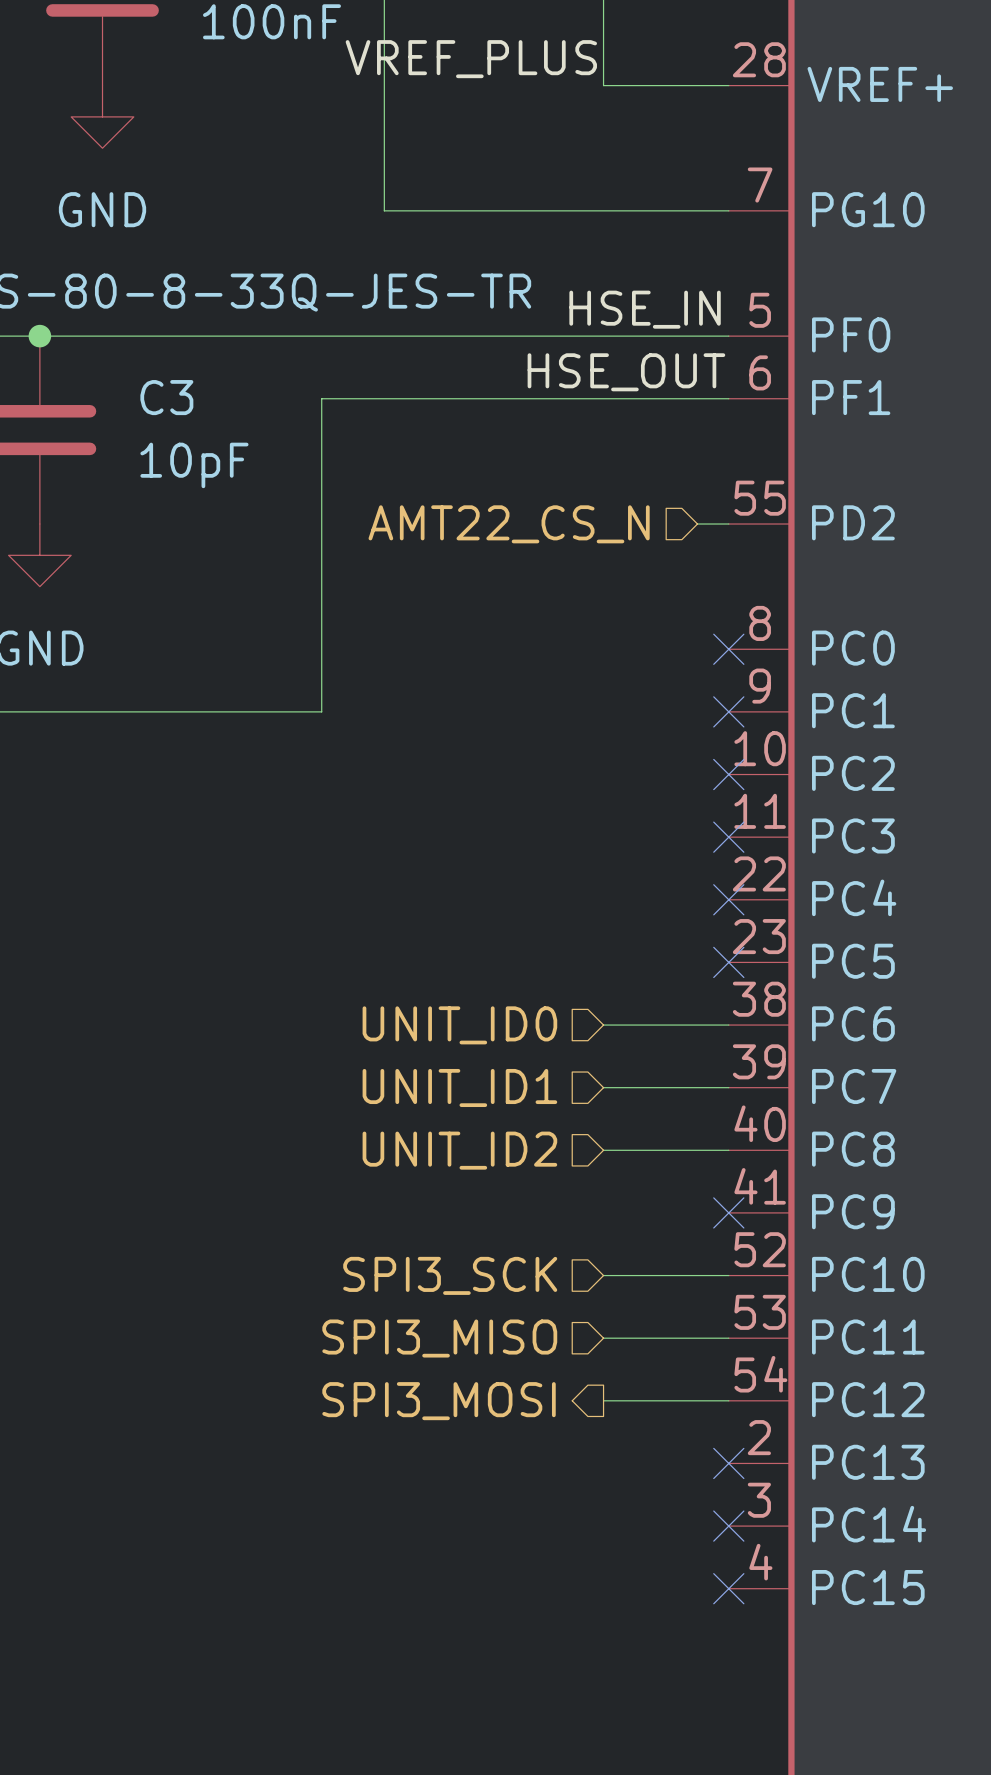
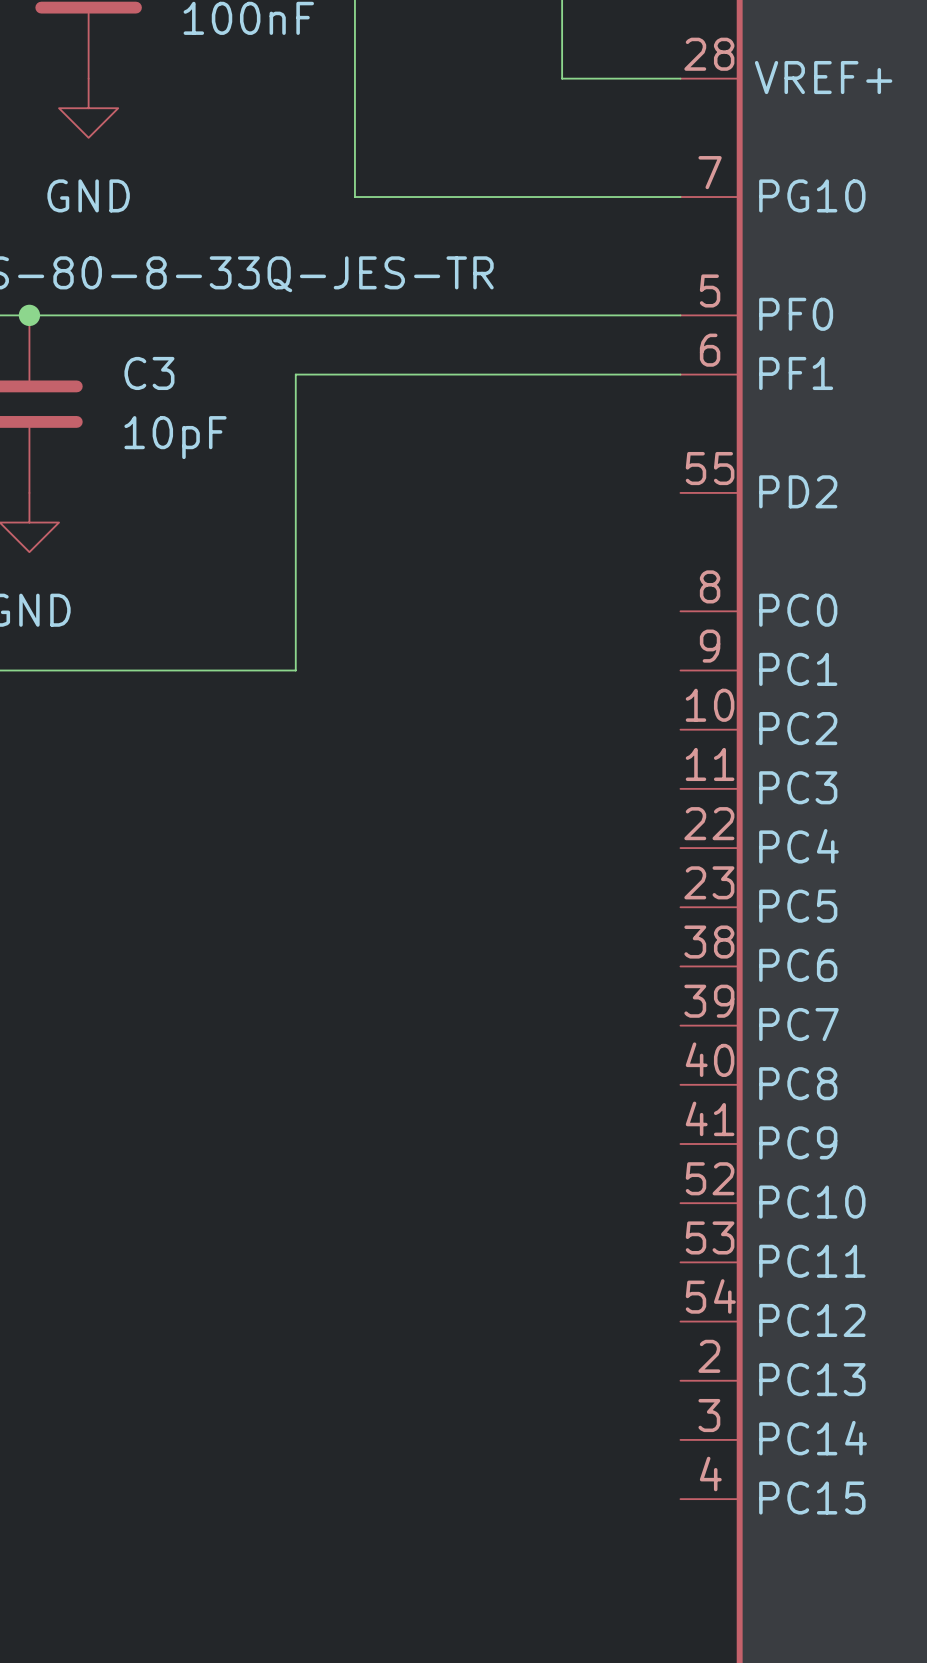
label: VREF_PLUS (471, 59) -> none
label: HSE_IN (645, 309) -> none
label: HSE_OUT (626, 372) -> none
hierarchical label: AMT22_CS_N (509, 524) -> none
wire: (697, 524) (728, 524) -> none
no-connect mark: (728, 649) -> none
no-connect mark: (728, 711) -> none
no-connect mark: (728, 774) -> none
no-connect mark: (728, 837) -> none
no-connect mark: (728, 899) -> none
no-connect mark: (728, 962) -> none
hierarchical label: UNIT_ID0 (459, 1025) -> none
wire: (603, 1025) (728, 1025) -> none
hierarchical label: UNIT_ID1 (459, 1087) -> none
wire: (603, 1087) (728, 1087) -> none
hierarchical label: UNIT_ID2 (459, 1150) -> none
wire: (603, 1150) (728, 1150) -> none
no-connect mark: (728, 1212) -> none
hierarchical label: SPI3_SCK (450, 1275) -> none
wire: (603, 1275) (728, 1275) -> none
hierarchical label: SPI3_MISO (439, 1338) -> none
wire: (603, 1338) (728, 1338) -> none
wire: (603, 1400) (728, 1400) -> none
hierarchical label: SPI3_MOSI (439, 1401) -> none
no-connect mark: (728, 1463) -> none
no-connect mark: (728, 1526) -> none
no-connect mark: (728, 1588) -> none

